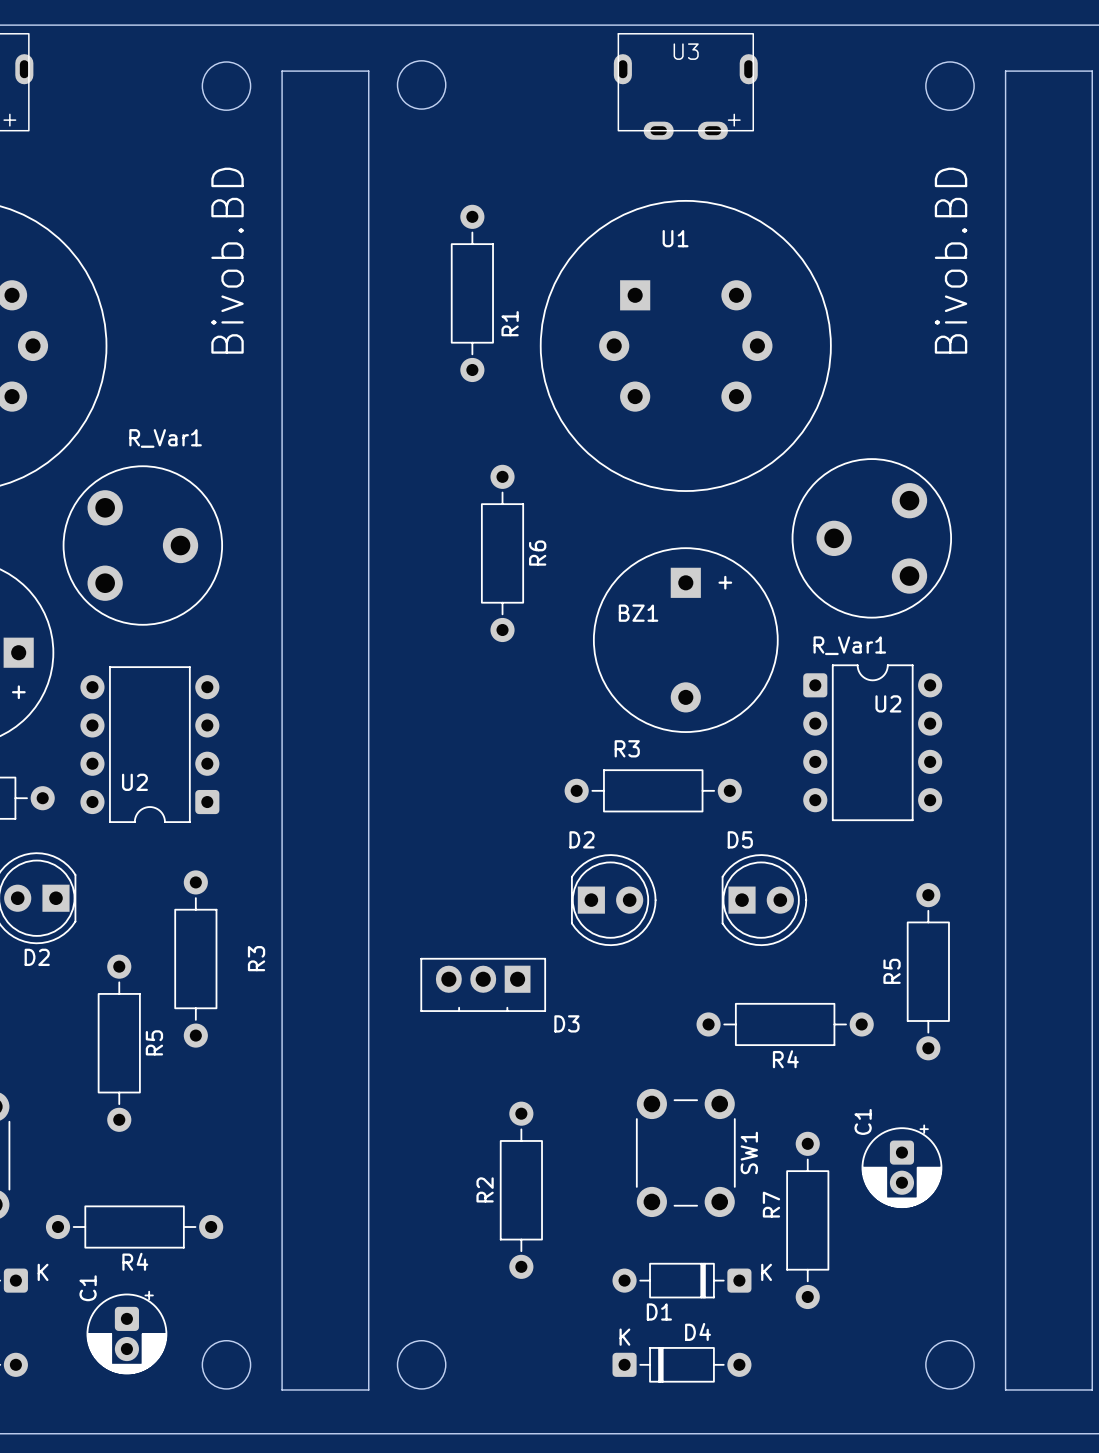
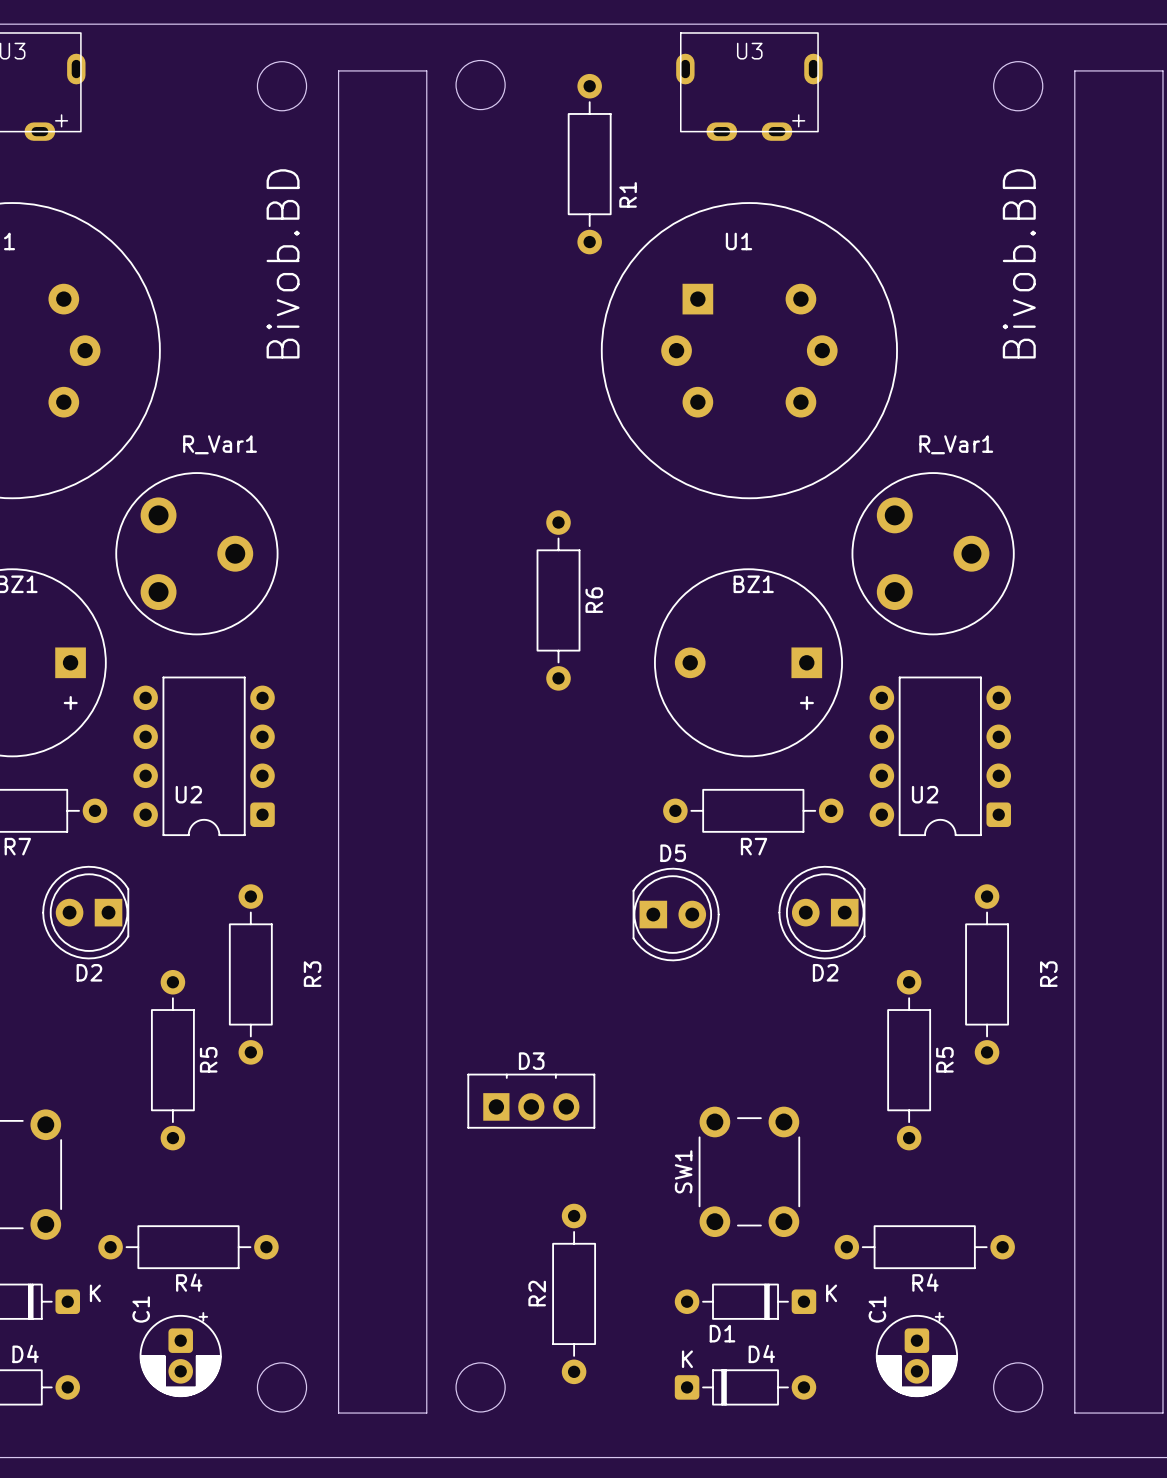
R1 position: (472, 293) -> (589, 164)
R_Var1 rotation: 0° (871, 538) -> 180° (933, 553)
R6 position: (502, 553) -> (558, 600)
BZ1 name position: BZ1 (638, 613) -> BZ1 (753, 584)
BZ1 rotation: 0° (685, 640) -> 90° clockwise (748, 662)
U2 rotation: 0° (872, 742) -> 180° (940, 756)
R3 name position: R3 (627, 748) -> R3 (1048, 974)
R3 rotation: 0° (653, 790) -> 90° clockwise (987, 974)
R3 position: (653, 790) -> (987, 974)
R7: none -> (753, 810)
D2 name: D2 (582, 839) -> D5 (673, 853)
D2: none -> (821, 912)
D5: (764, 900) -> none
R5 name position: R5 (892, 971) -> R5 (944, 1059)
R5 position: (928, 971) -> (909, 1060)
D3 rotation: 0° (483, 984) -> 180° (531, 1101)
D3 position: (483, 984) -> (531, 1101)
D3 name position: D3 (566, 1023) -> D3 (531, 1061)
R4 position: (785, 1024) -> (924, 1247)
SW1 name position: SW1 (749, 1152) -> SW1 (683, 1171)
C1 position: (901, 1166) -> (916, 1354)
R2 position: (521, 1190) -> (574, 1293)
R7: (807, 1220) -> none

